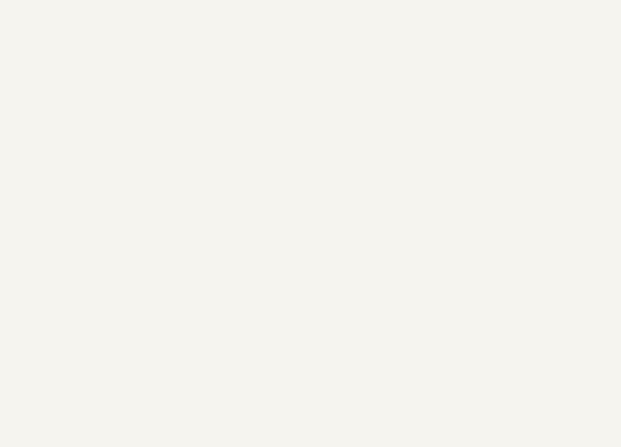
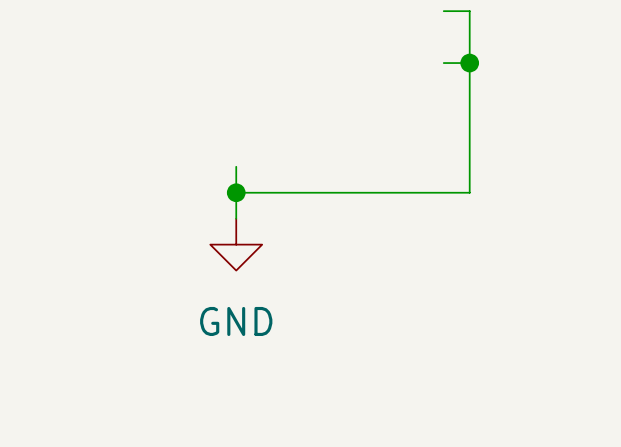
wire: none -> (443, 11) (469, 11) (469, 192) (236, 192)
wire: none -> (443, 63) (469, 63)
junction: none -> (469, 63)
wire: none -> (236, 166) (236, 218)
junction: none -> (236, 192)
power symbol: none -> GND (236, 244)

